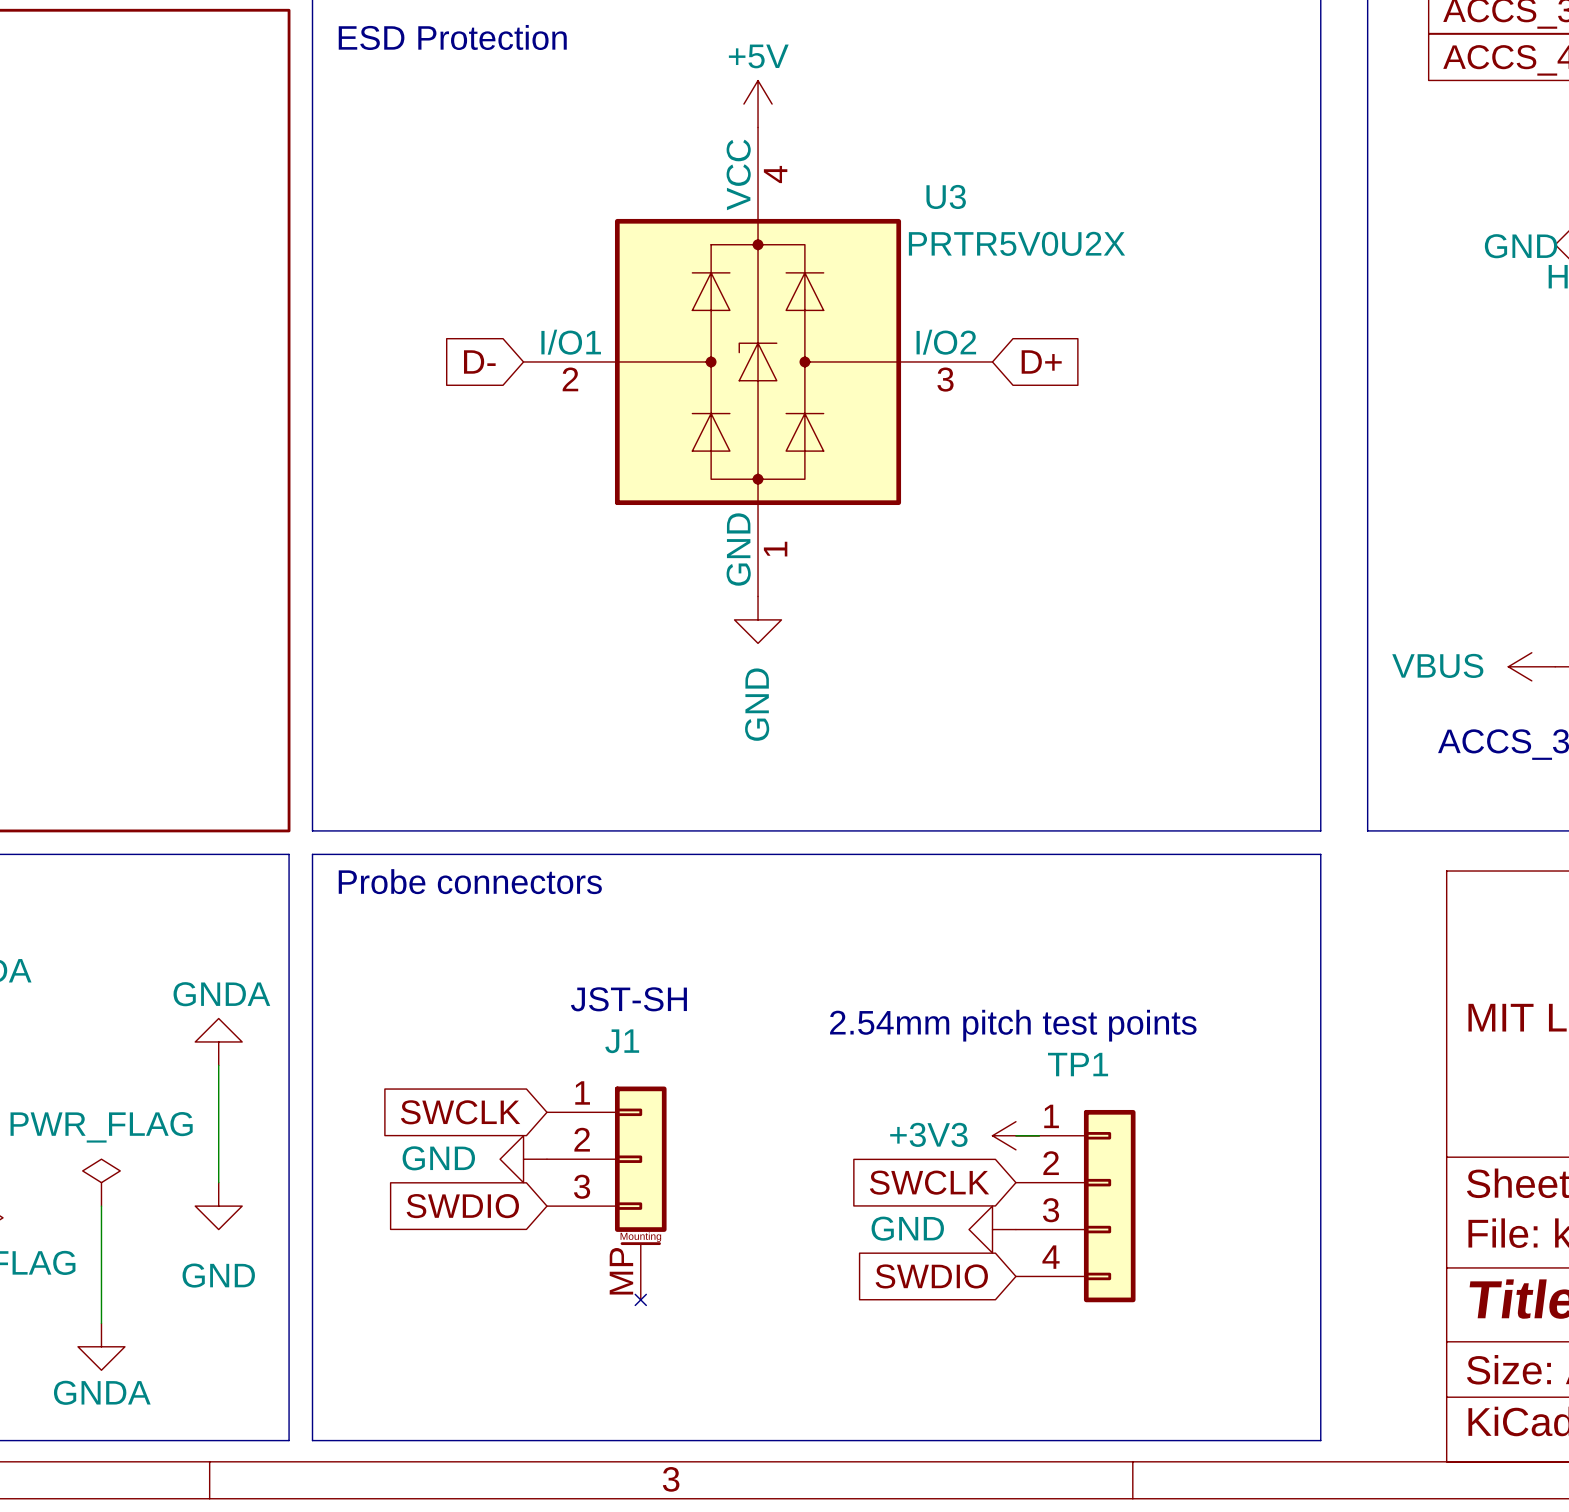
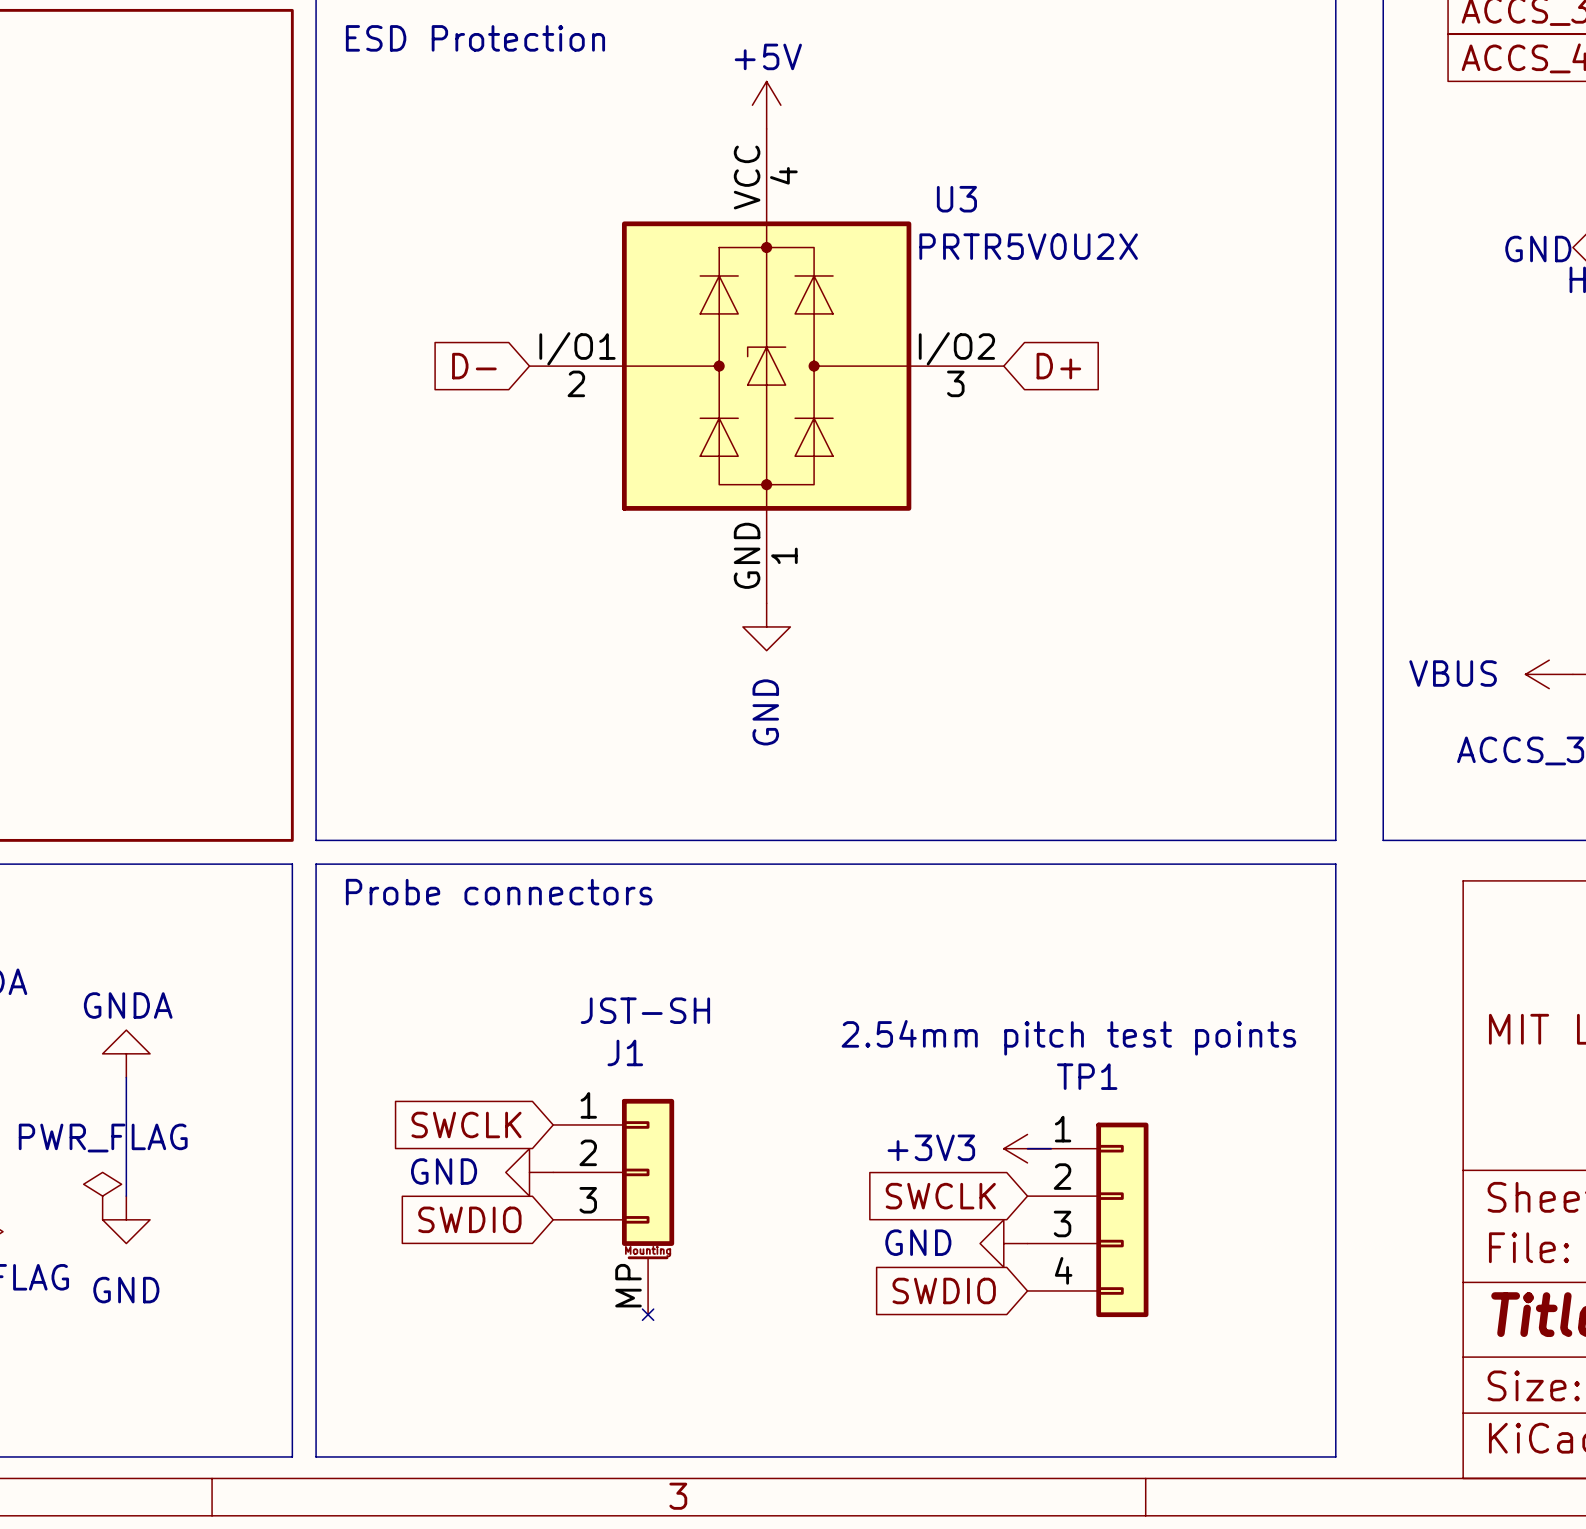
power symbol position: GNDA (218, 1041) -> GNDA (126, 1053)
wire: (218, 1065) (218, 1182) -> (126, 1077) (126, 1196)
wire: (101, 1206) (101, 1323) -> none
power symbol position: GND (218, 1206) -> GND (126, 1219)
power symbol: GNDA (101, 1346) -> none

